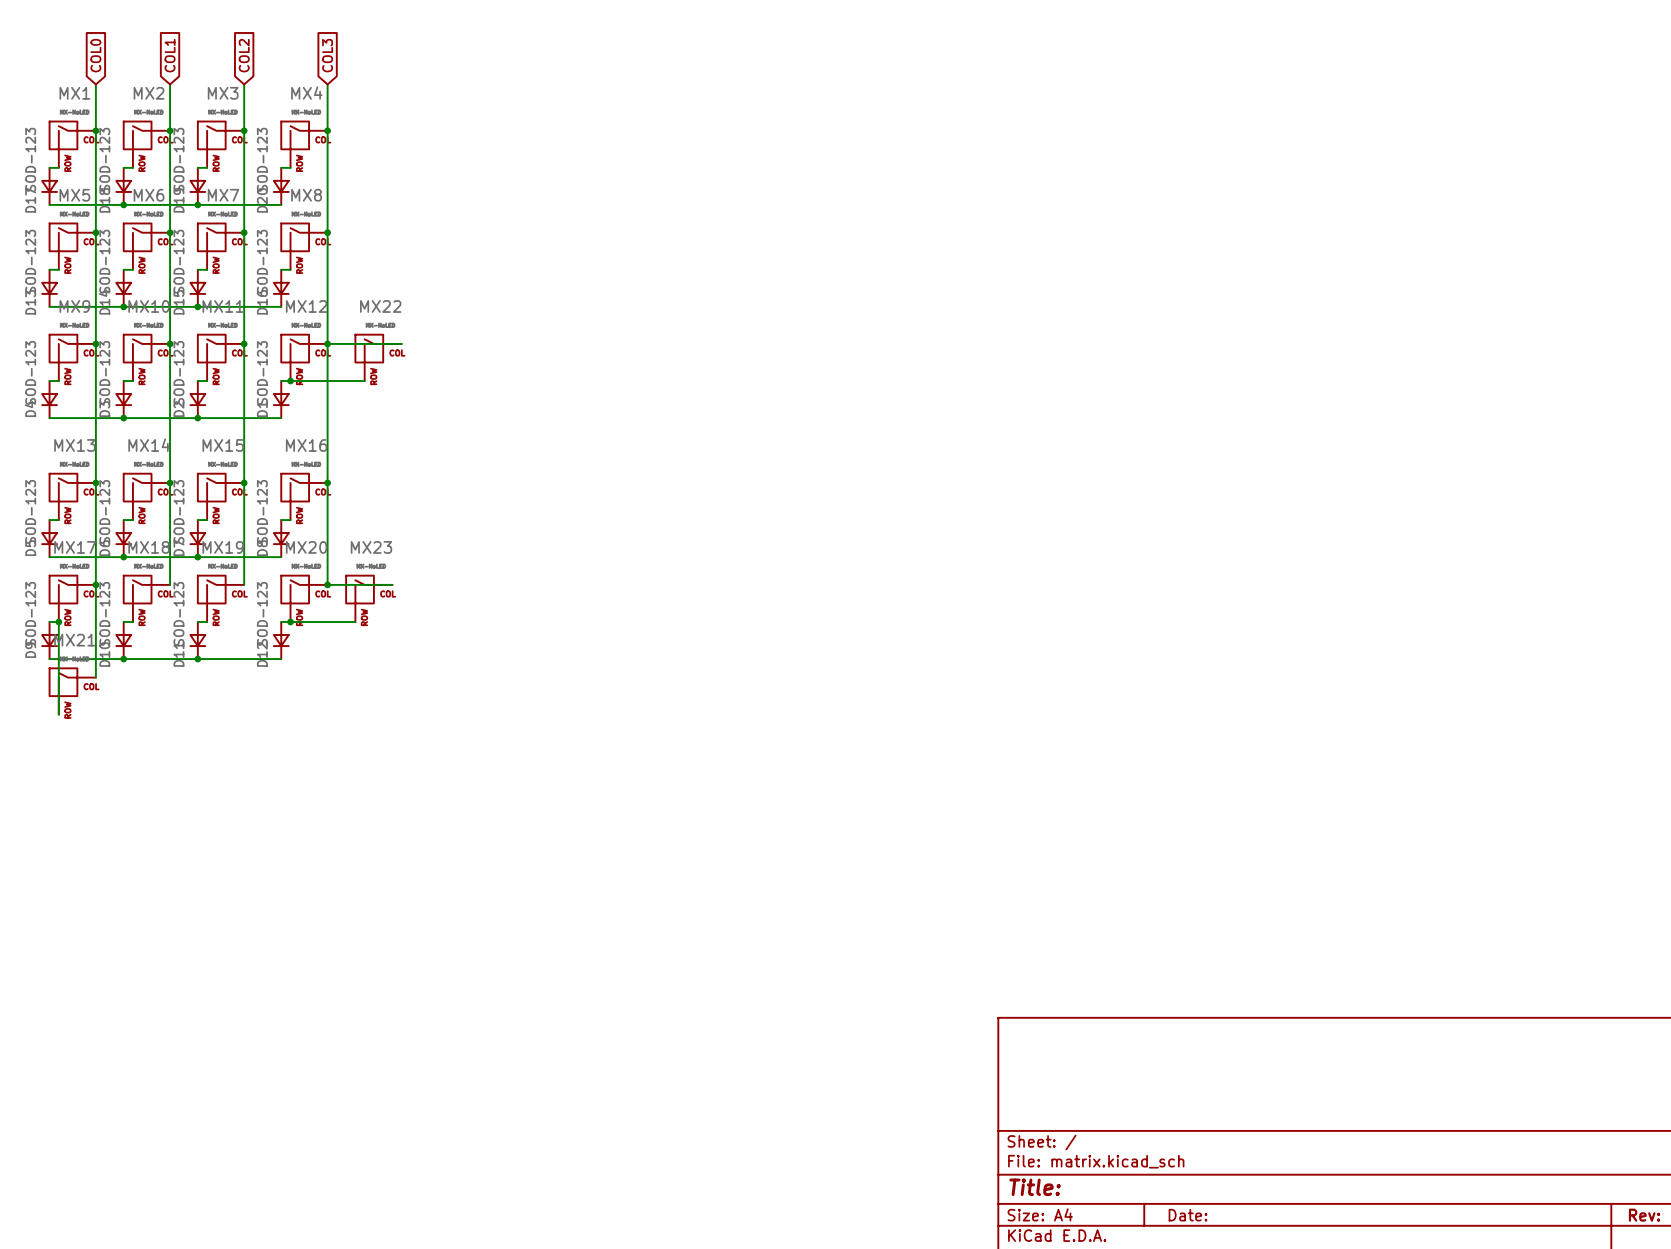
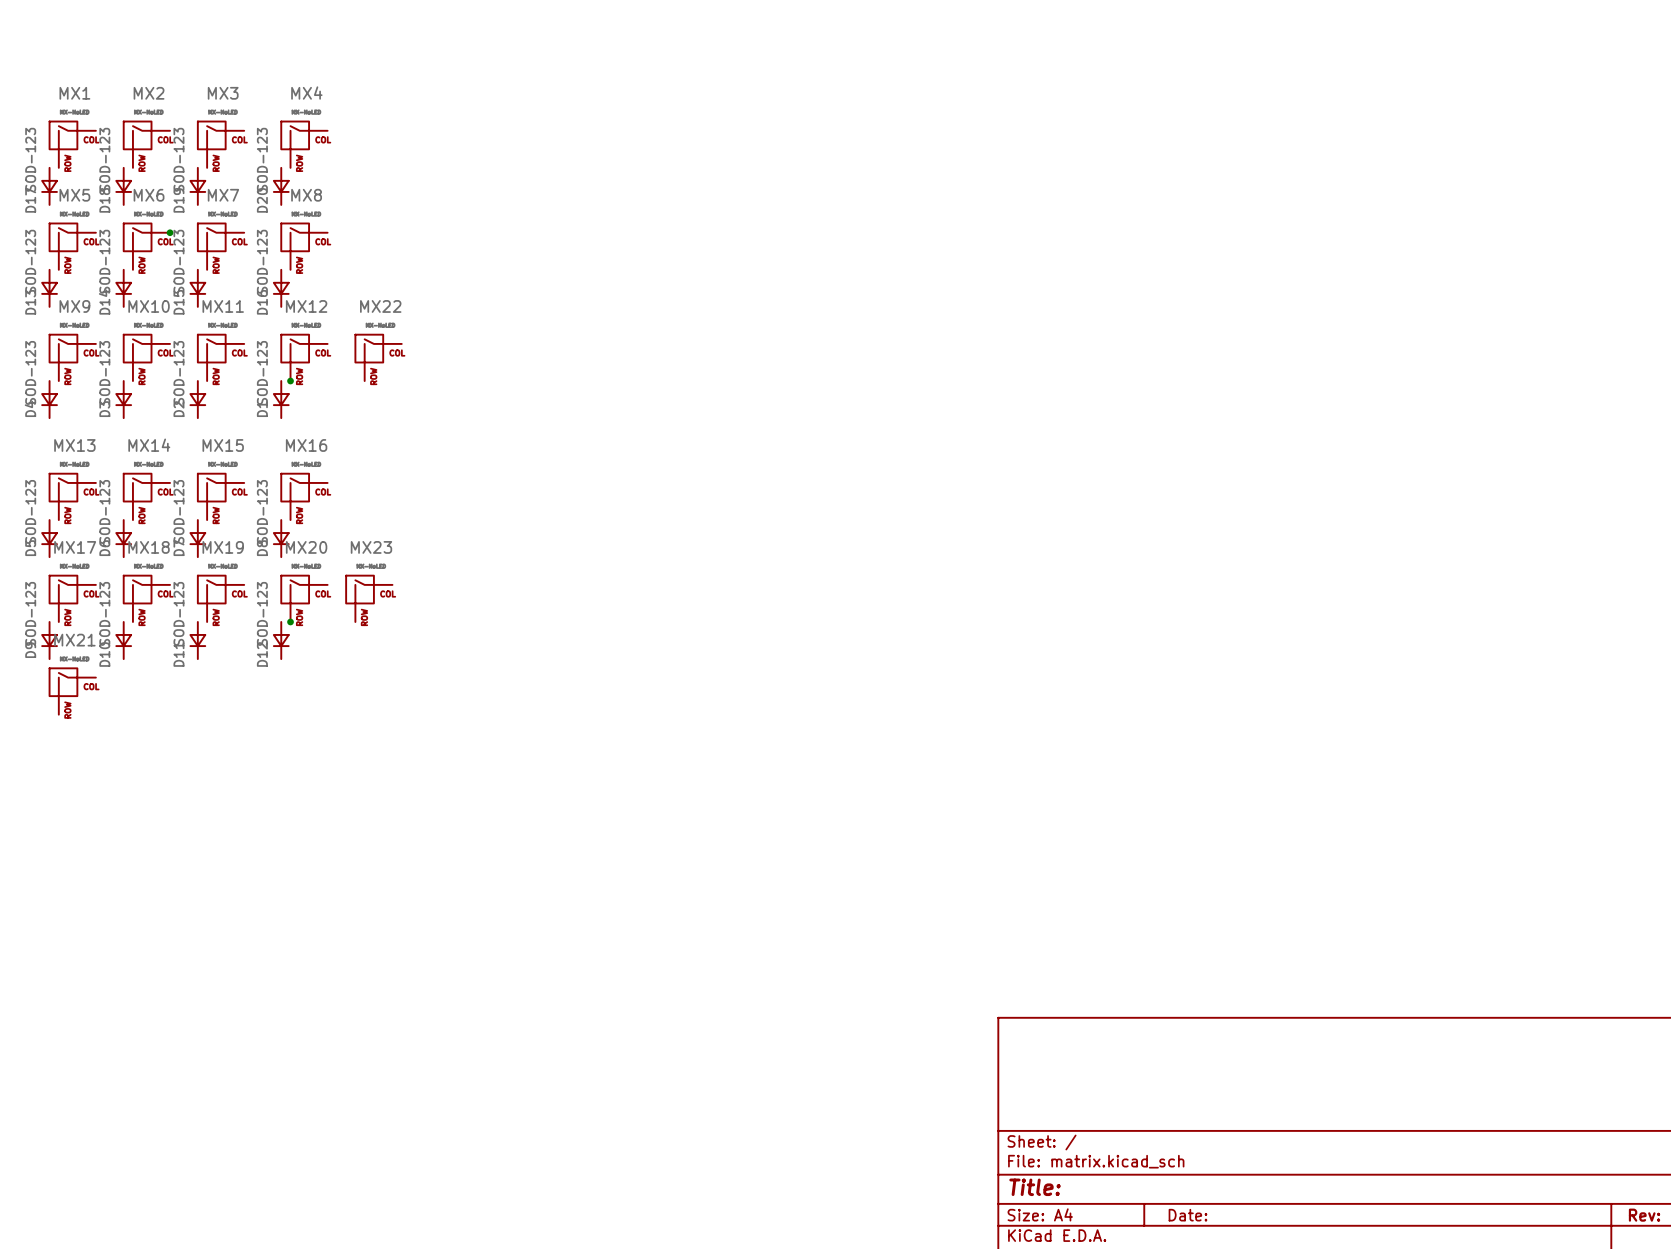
global label: COL0 (95, 55) -> none
global label: COL1 (170, 55) -> none
global label: COL2 (244, 55) -> none
global label: COL3 (327, 55) -> none
wire: (95, 84) (95, 677) -> none
wire: (170, 84) (170, 584) -> none
wire: (244, 84) (244, 584) -> none
wire: (327, 84) (327, 584) (392, 584) -> none
junction: (95, 130) -> none
junction: (170, 130) -> none
junction: (244, 130) -> none
junction: (327, 130) -> none
wire: (49, 167) (58, 167) -> none
wire: (123, 167) (132, 167) -> none
wire: (197, 167) (207, 167) -> none
wire: (281, 167) (290, 167) -> none
wire: (49, 204) (281, 204) -> none
junction: (123, 204) -> none
junction: (197, 204) -> none
junction: (95, 232) -> none
junction: (244, 232) -> none
junction: (327, 232) -> none
wire: (49, 269) (58, 269) -> none
wire: (123, 269) (132, 269) -> none
wire: (197, 269) (207, 269) -> none
wire: (281, 269) (290, 269) -> none
wire: (49, 306) (281, 306) -> none
junction: (123, 306) -> none
junction: (197, 306) -> none
junction: (95, 343) -> none
junction: (170, 343) -> none
junction: (244, 343) -> none
wire: (327, 343) (401, 343) -> none
junction: (327, 343) -> none
wire: (49, 381) (58, 381) -> none
wire: (123, 381) (132, 381) -> none
wire: (197, 381) (207, 381) -> none
wire: (281, 381) (364, 381) -> none
wire: (49, 418) (281, 418) -> none
junction: (123, 418) -> none
junction: (197, 418) -> none
junction: (95, 482) -> none
junction: (170, 482) -> none
junction: (244, 482) -> none
junction: (327, 482) -> none
wire: (49, 520) (58, 520) -> none
wire: (123, 520) (132, 520) -> none
wire: (197, 520) (207, 520) -> none
wire: (281, 520) (290, 520) -> none
wire: (49, 557) (281, 557) -> none
junction: (123, 557) -> none
junction: (197, 557) -> none
junction: (95, 584) -> none
junction: (327, 584) -> none
wire: (49, 621) (58, 621) (58, 714) -> none
junction: (58, 621) -> none
wire: (123, 621) (132, 621) -> none
wire: (197, 621) (207, 621) -> none
wire: (281, 621) (355, 621) -> none
wire: (49, 659) (281, 659) -> none
junction: (123, 659) -> none
junction: (197, 659) -> none

